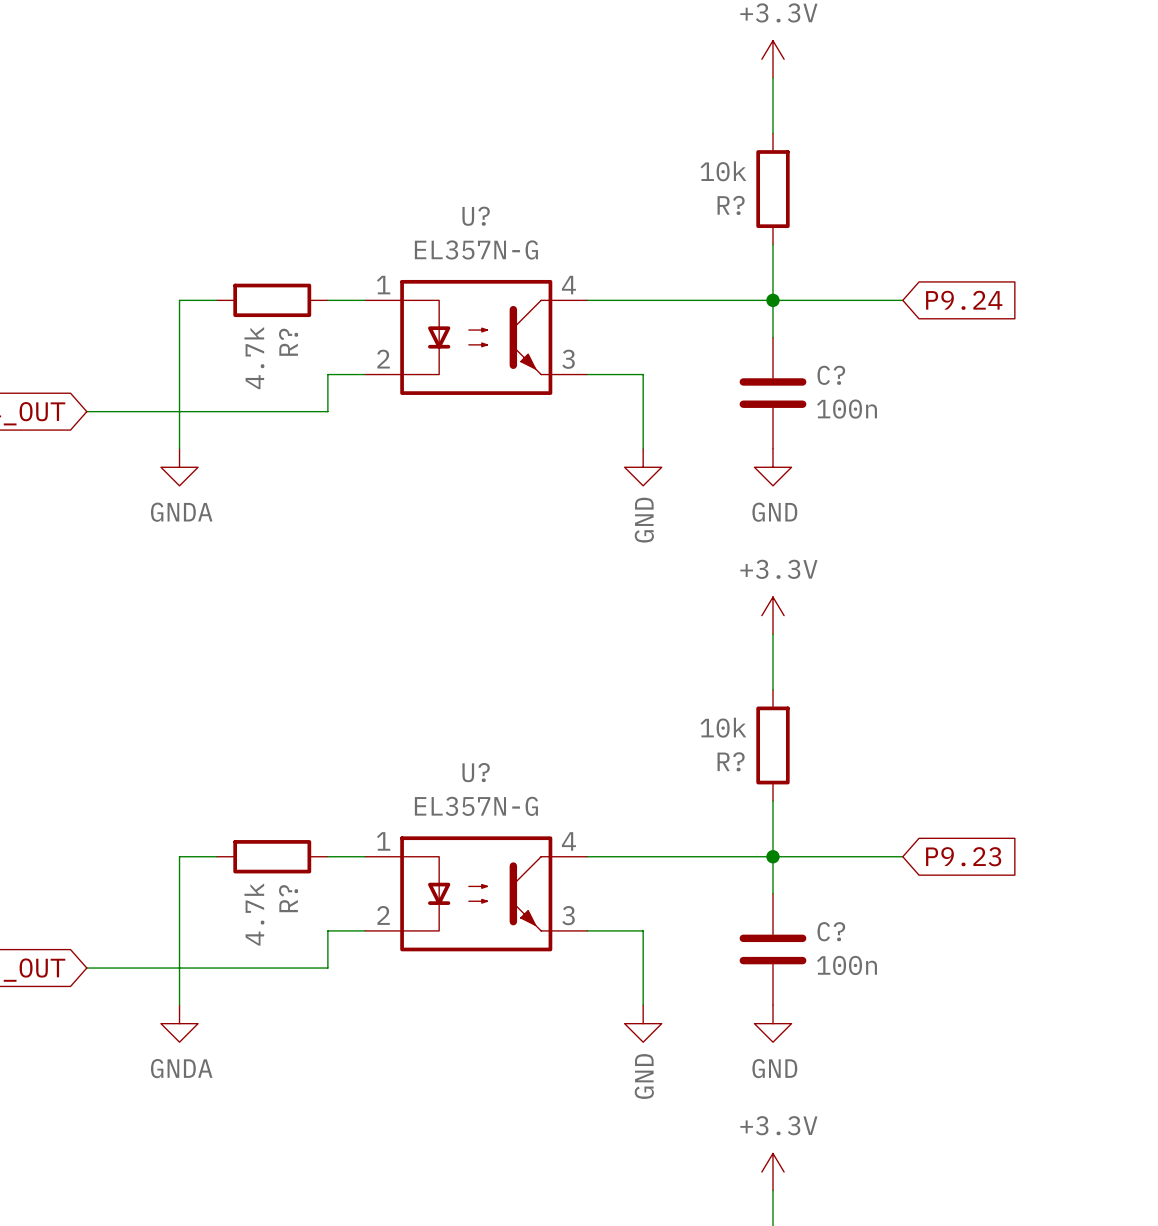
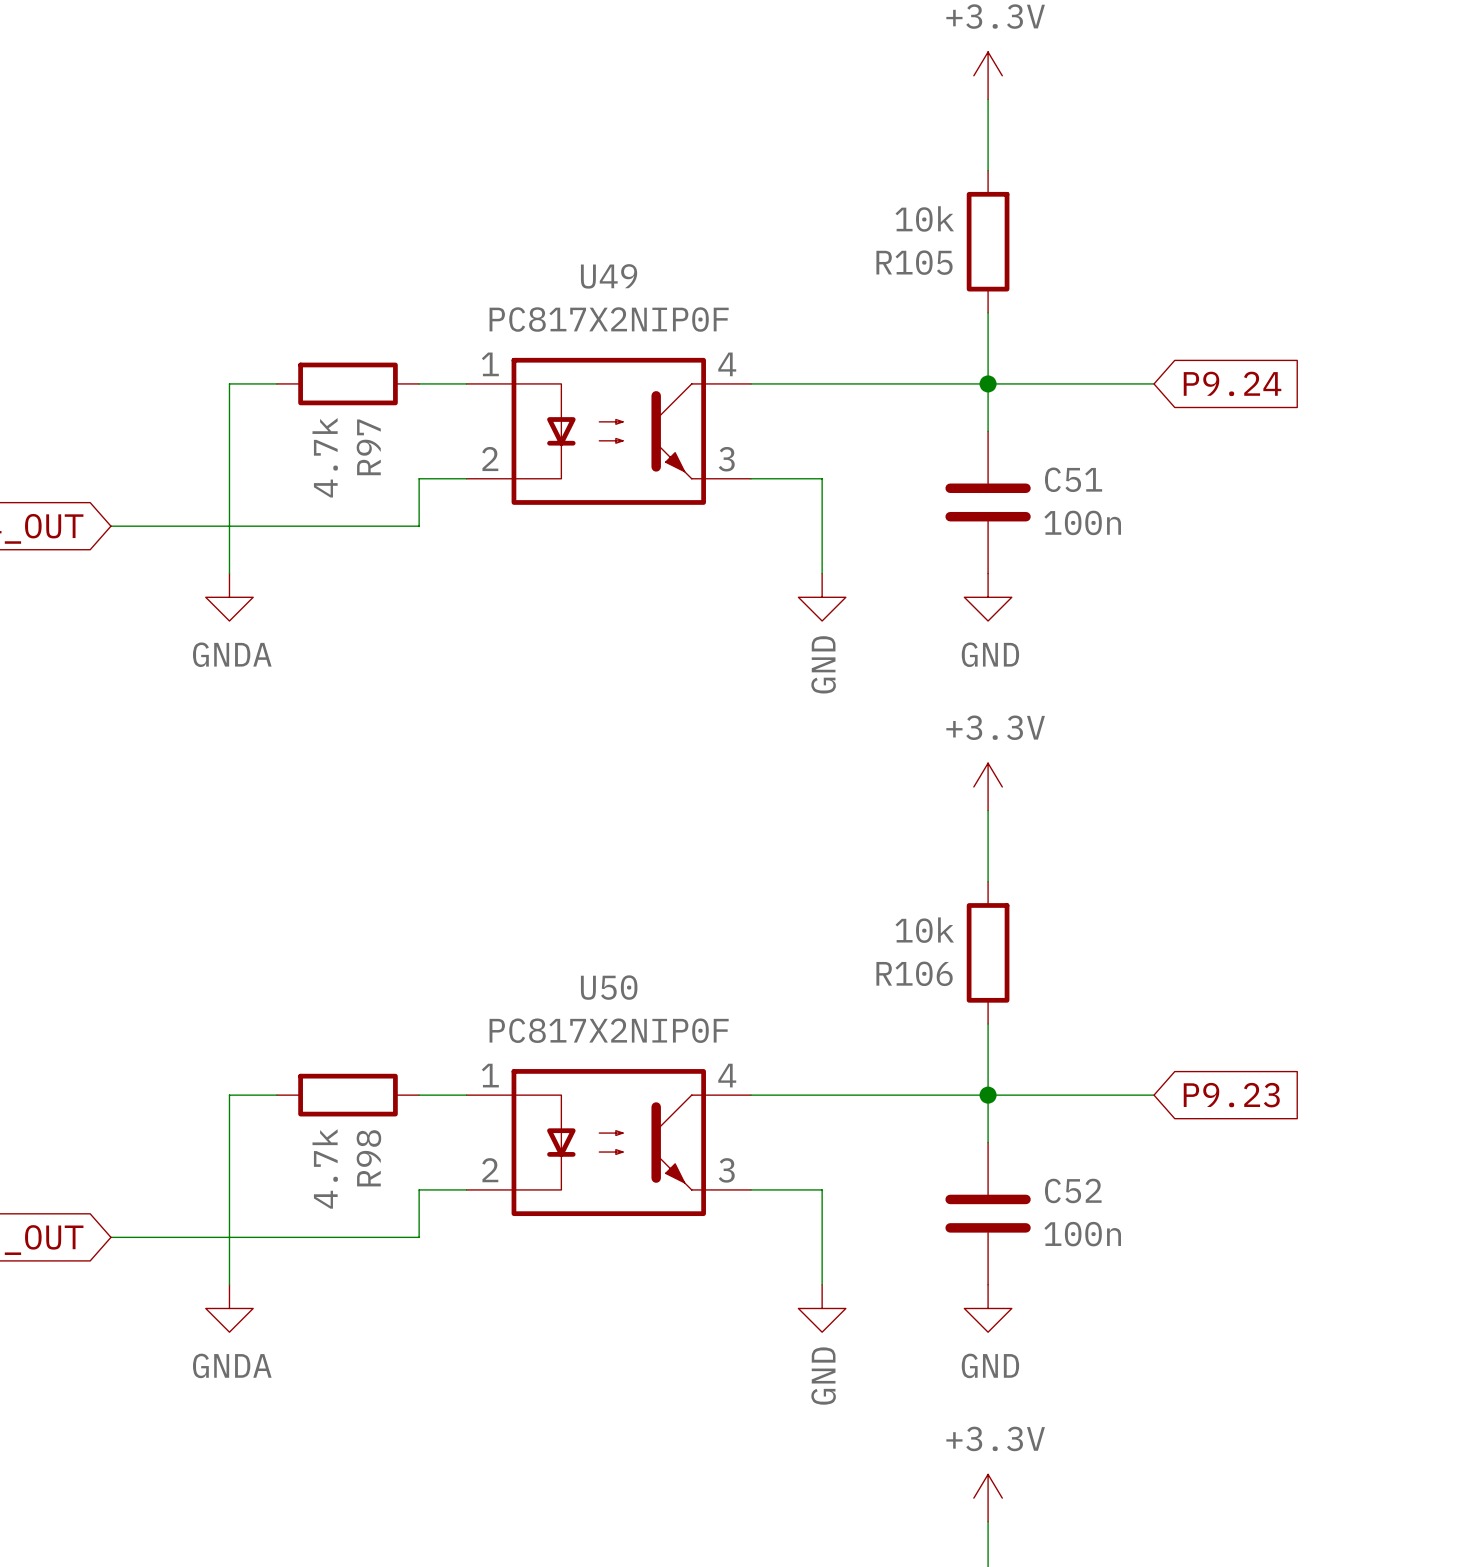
R? name: R? (731, 205) -> R105 (914, 262)
U? name: U? (476, 216) -> U49 (609, 276)
U? value: EL357N-G (476, 249) -> PC817X2NIP0F (609, 319)
R? name: R? (288, 342) -> R97 (368, 447)
C? name: C? (831, 375) -> C51 (1073, 479)
R? name: R? (731, 761) -> R106 (914, 973)
U? name: U? (476, 772) -> U50 (609, 987)
U? value: EL357N-G (476, 806) -> PC817X2NIP0F (609, 1030)
R? name: R? (288, 898) -> R98 (368, 1158)
C? name: C? (831, 931) -> C52 (1073, 1190)

